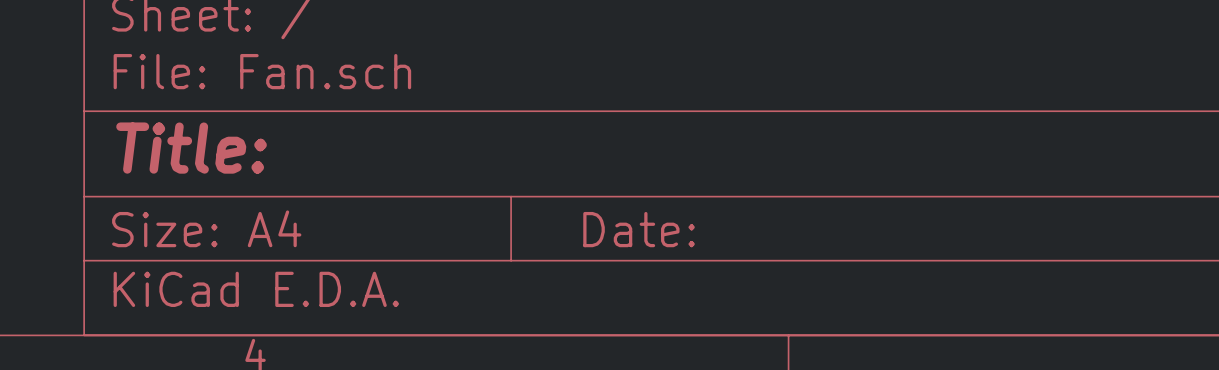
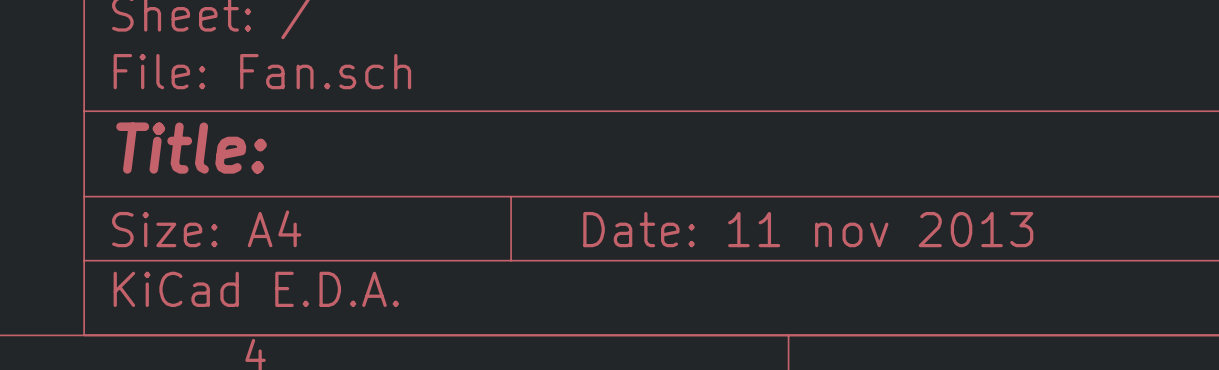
title block: Date: (639, 229) -> Date: 11 nov 2013 (808, 229)

